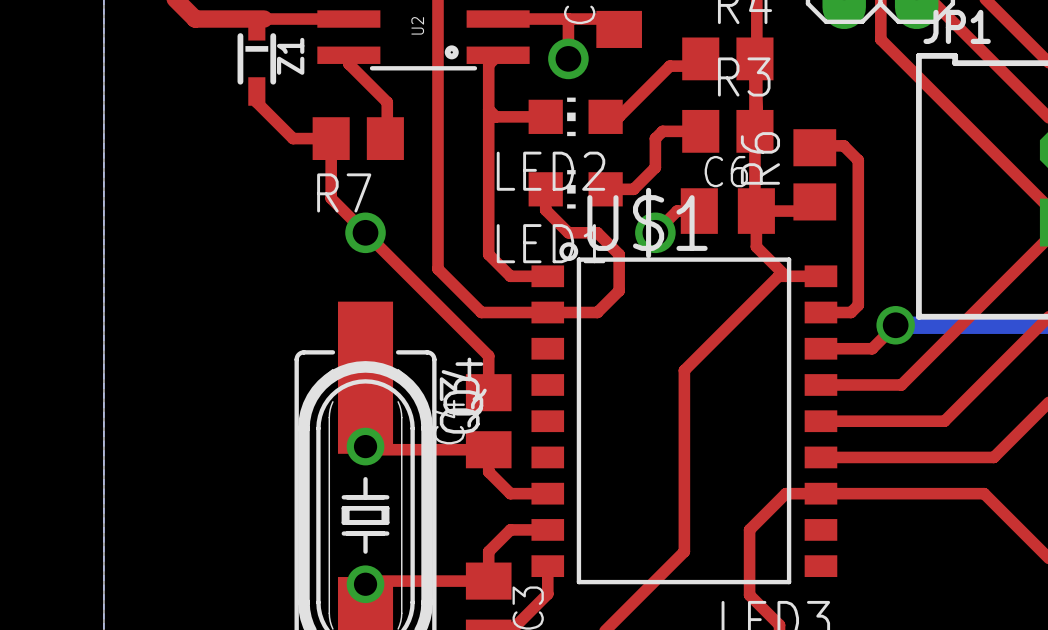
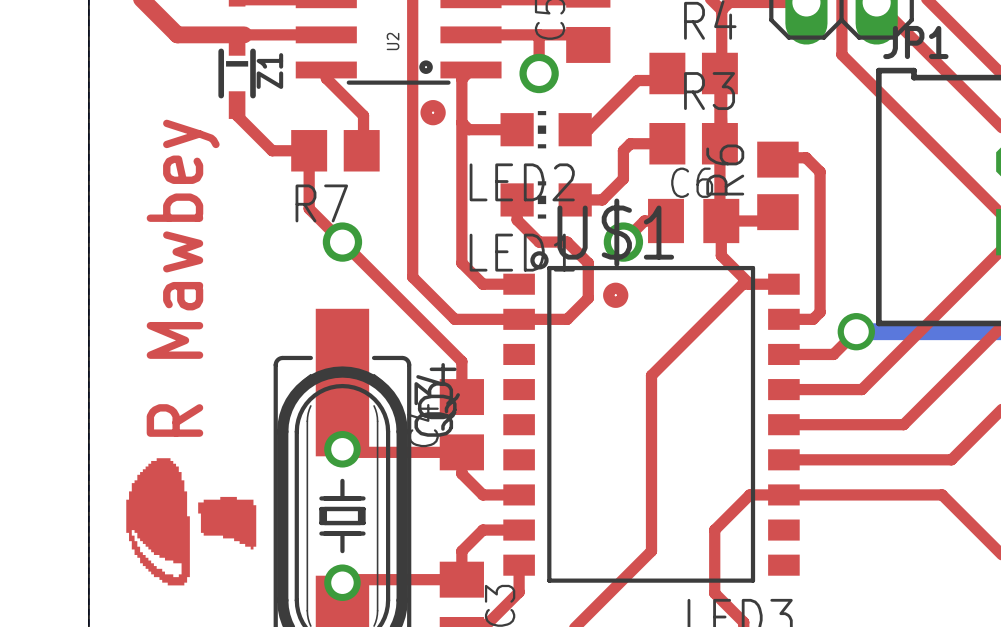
drawing: none -> [420, 100, 446, 126]
text: none -> R Mawbey (183, 278)
drawing: none -> [603, 282, 629, 308]
drawing: none -> [126, 458, 257, 586]

